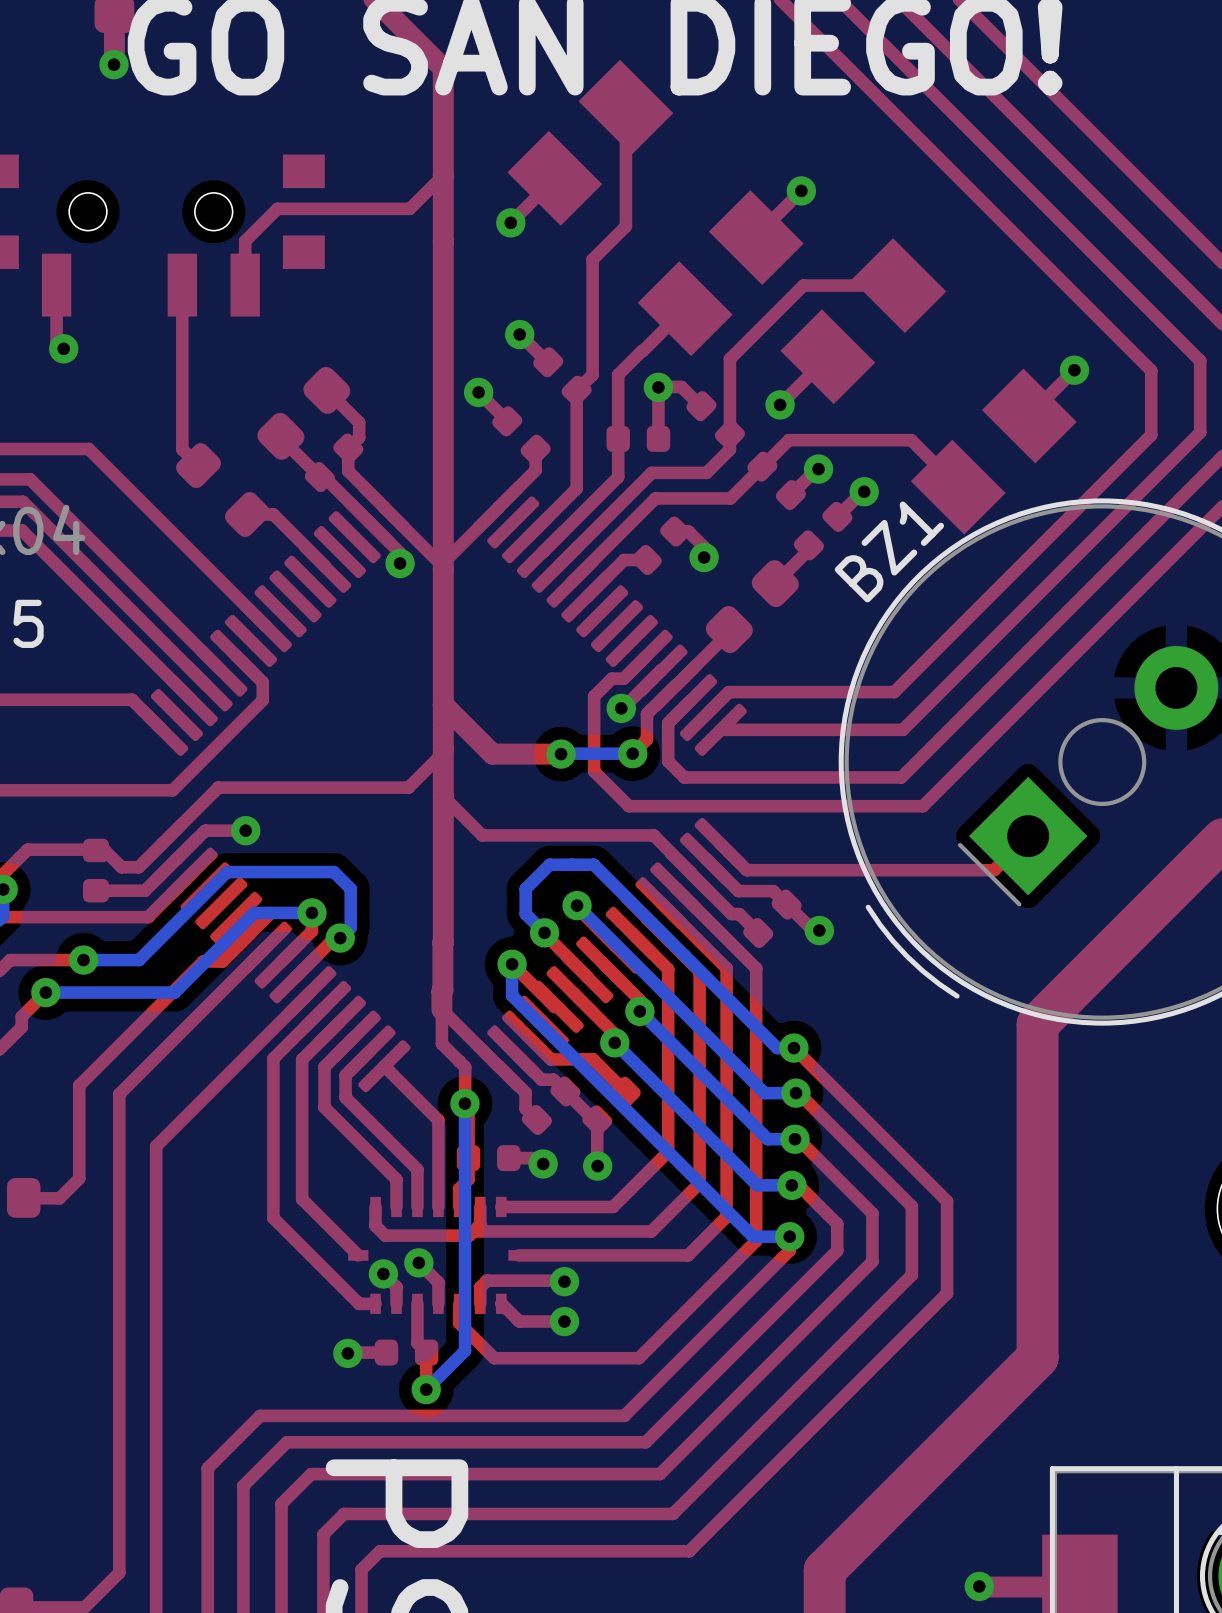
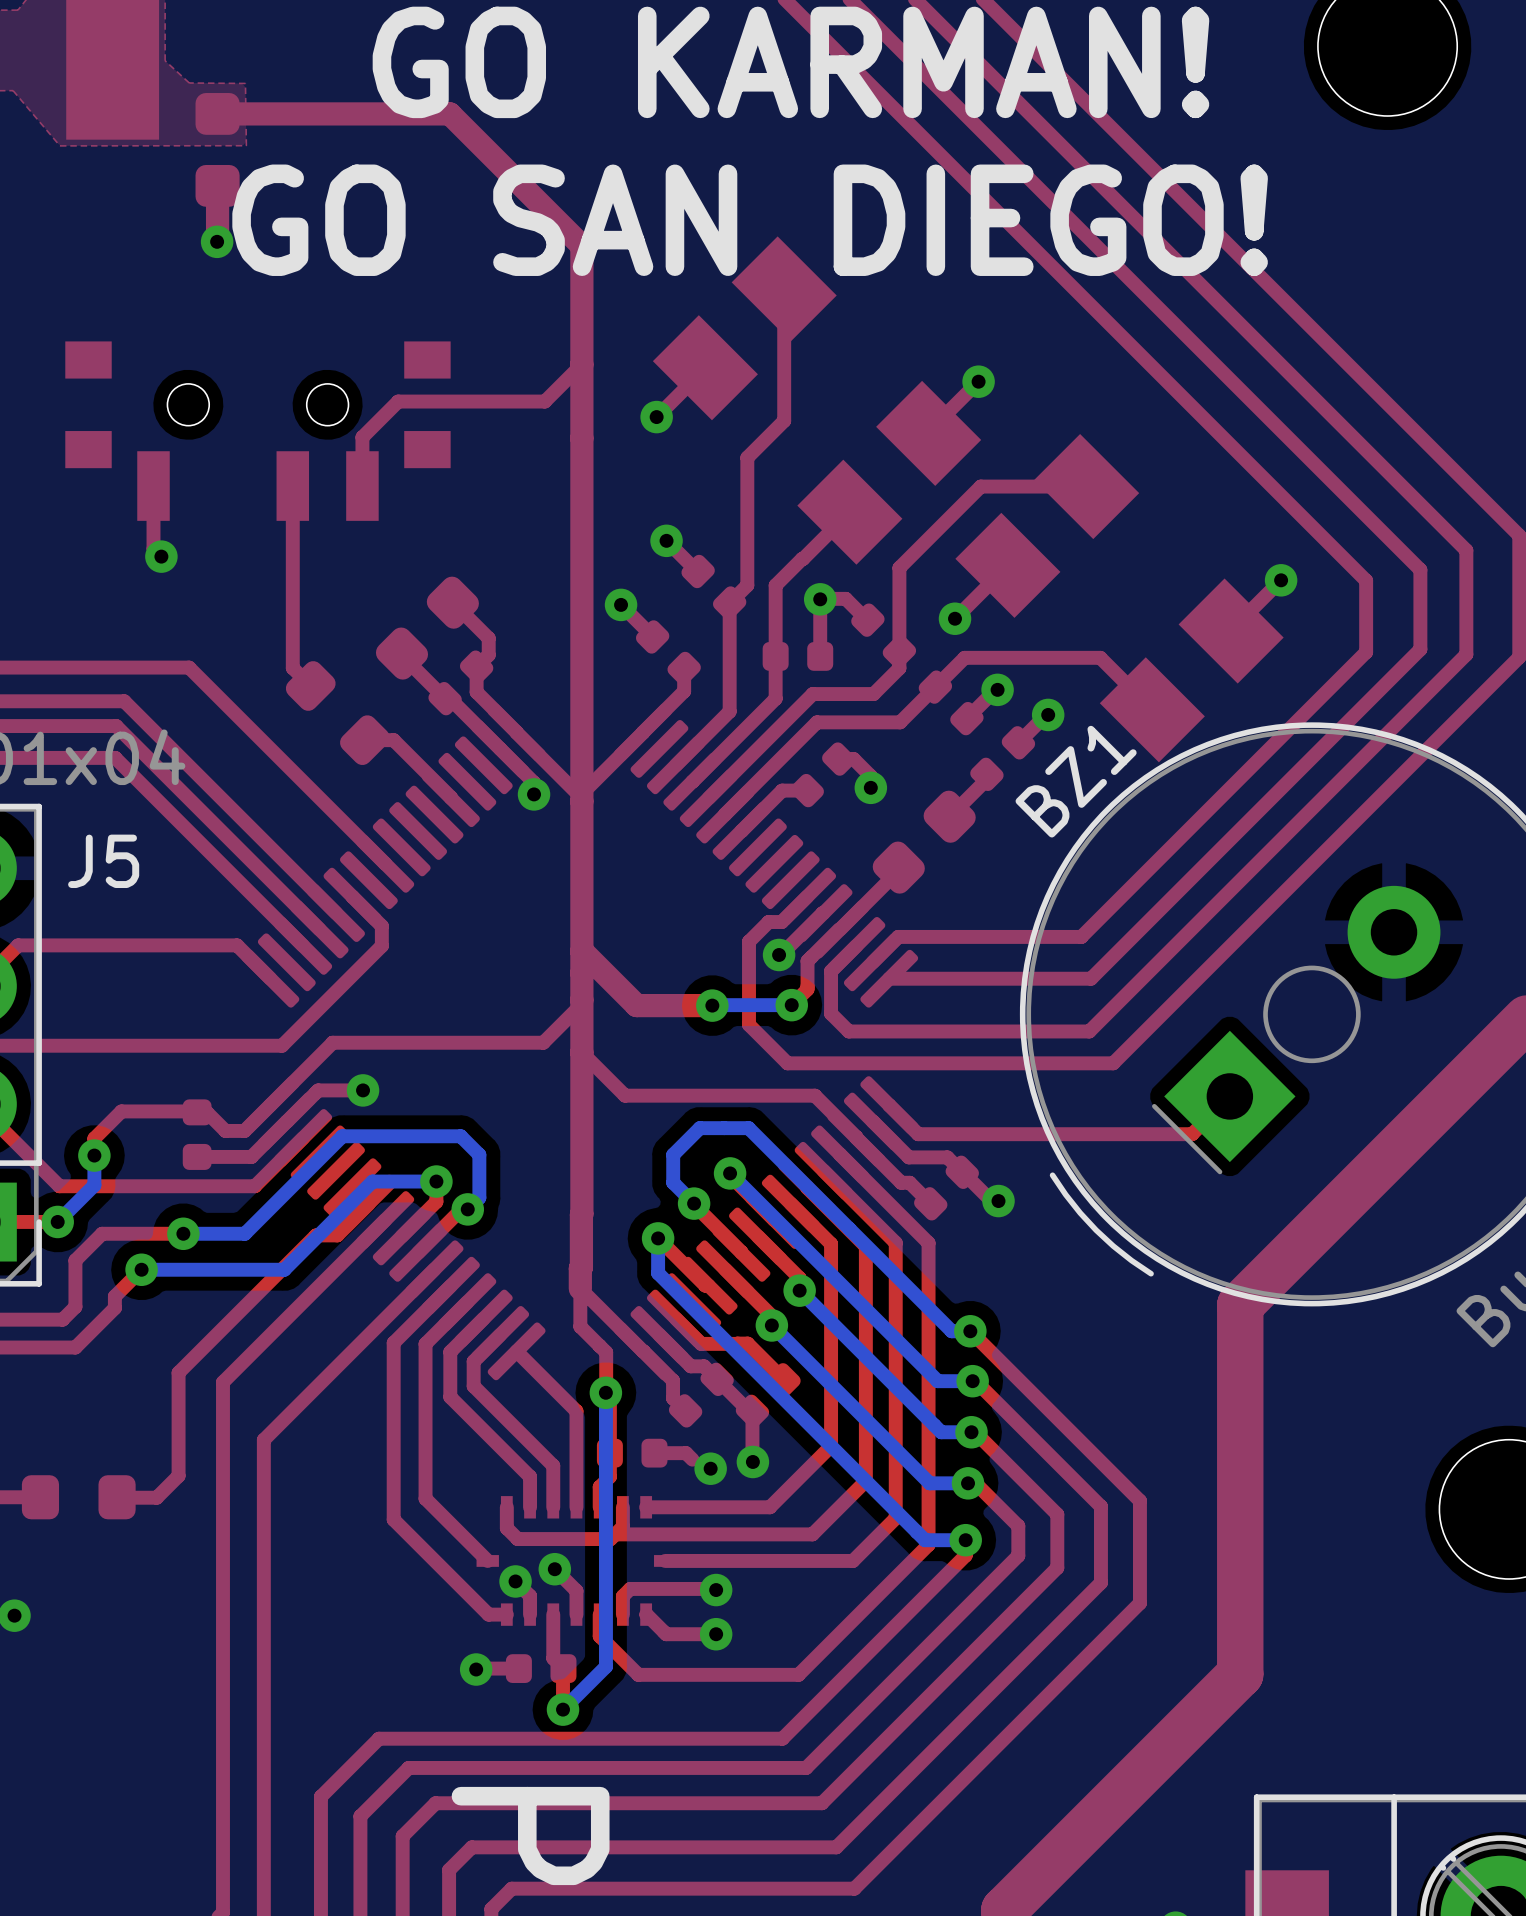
via position: (543, 1163) -> (710, 1468)

